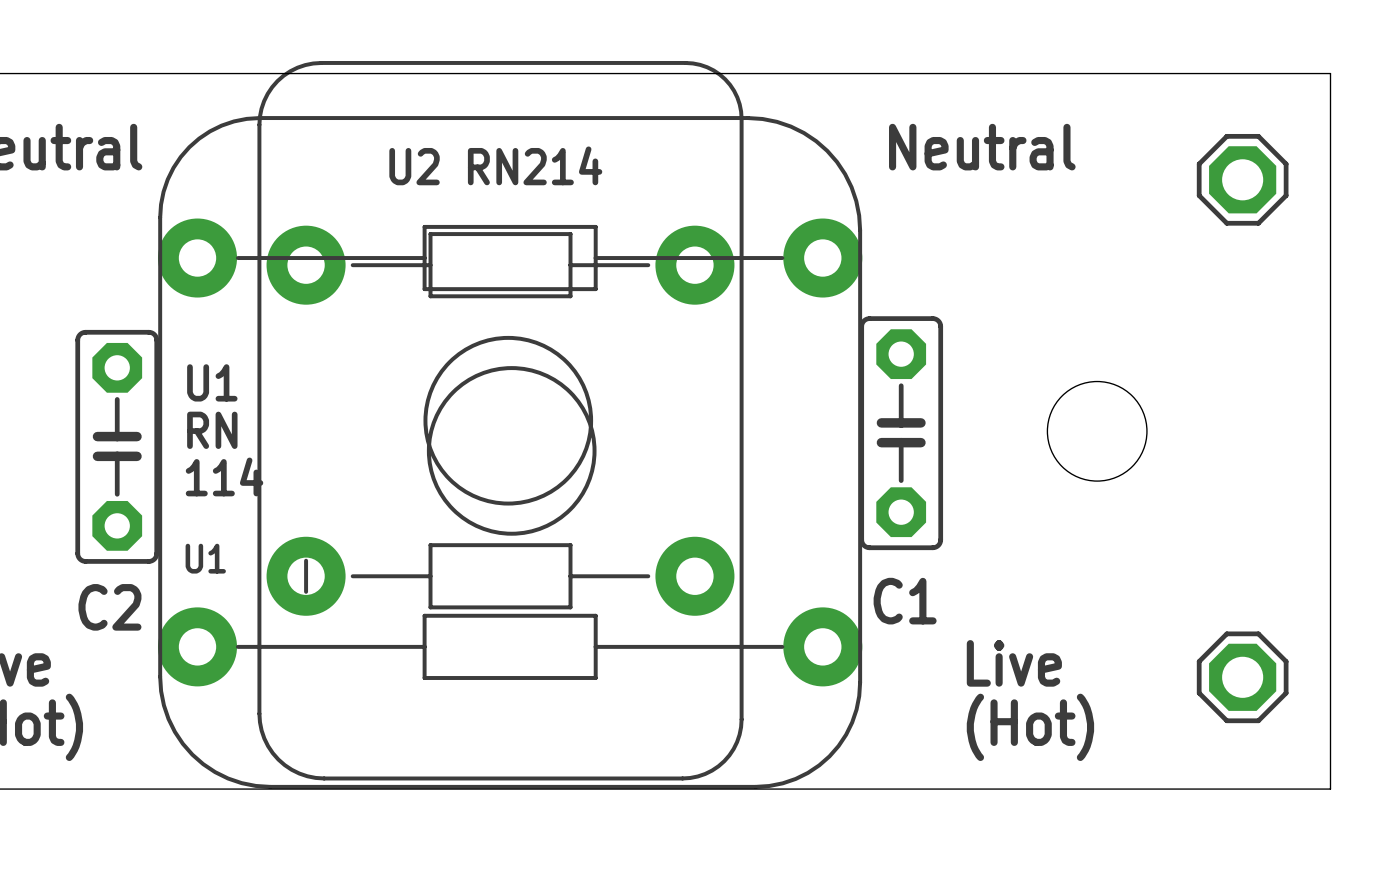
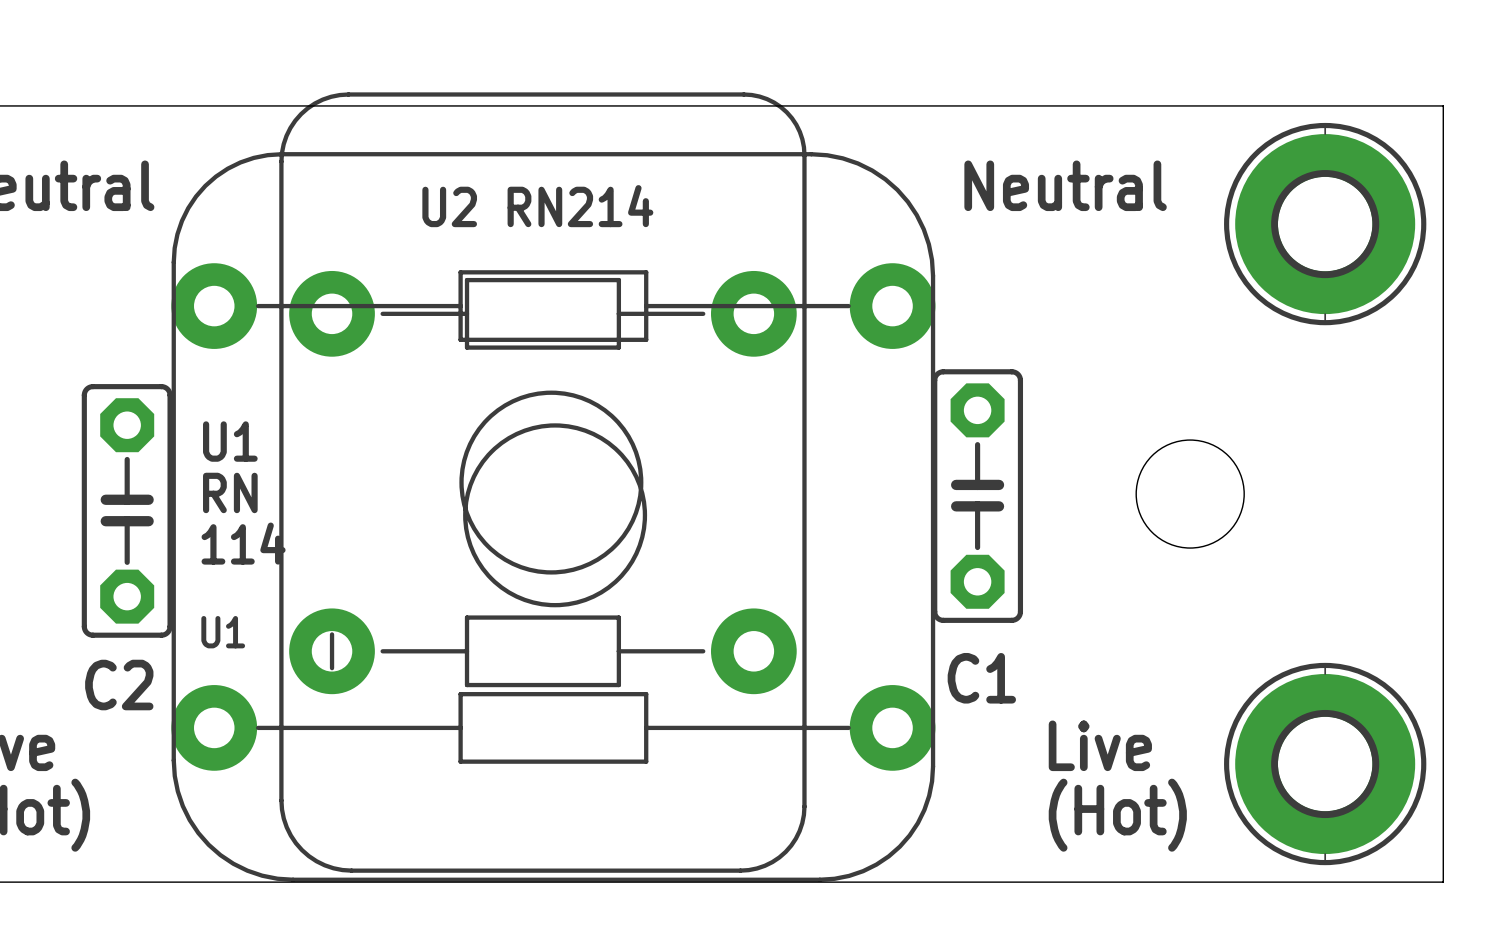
part footprint: [1196, 133, 1289, 226] -> [1224, 122, 1427, 326]
part footprint: [1196, 631, 1289, 724] -> [1224, 662, 1427, 866]

